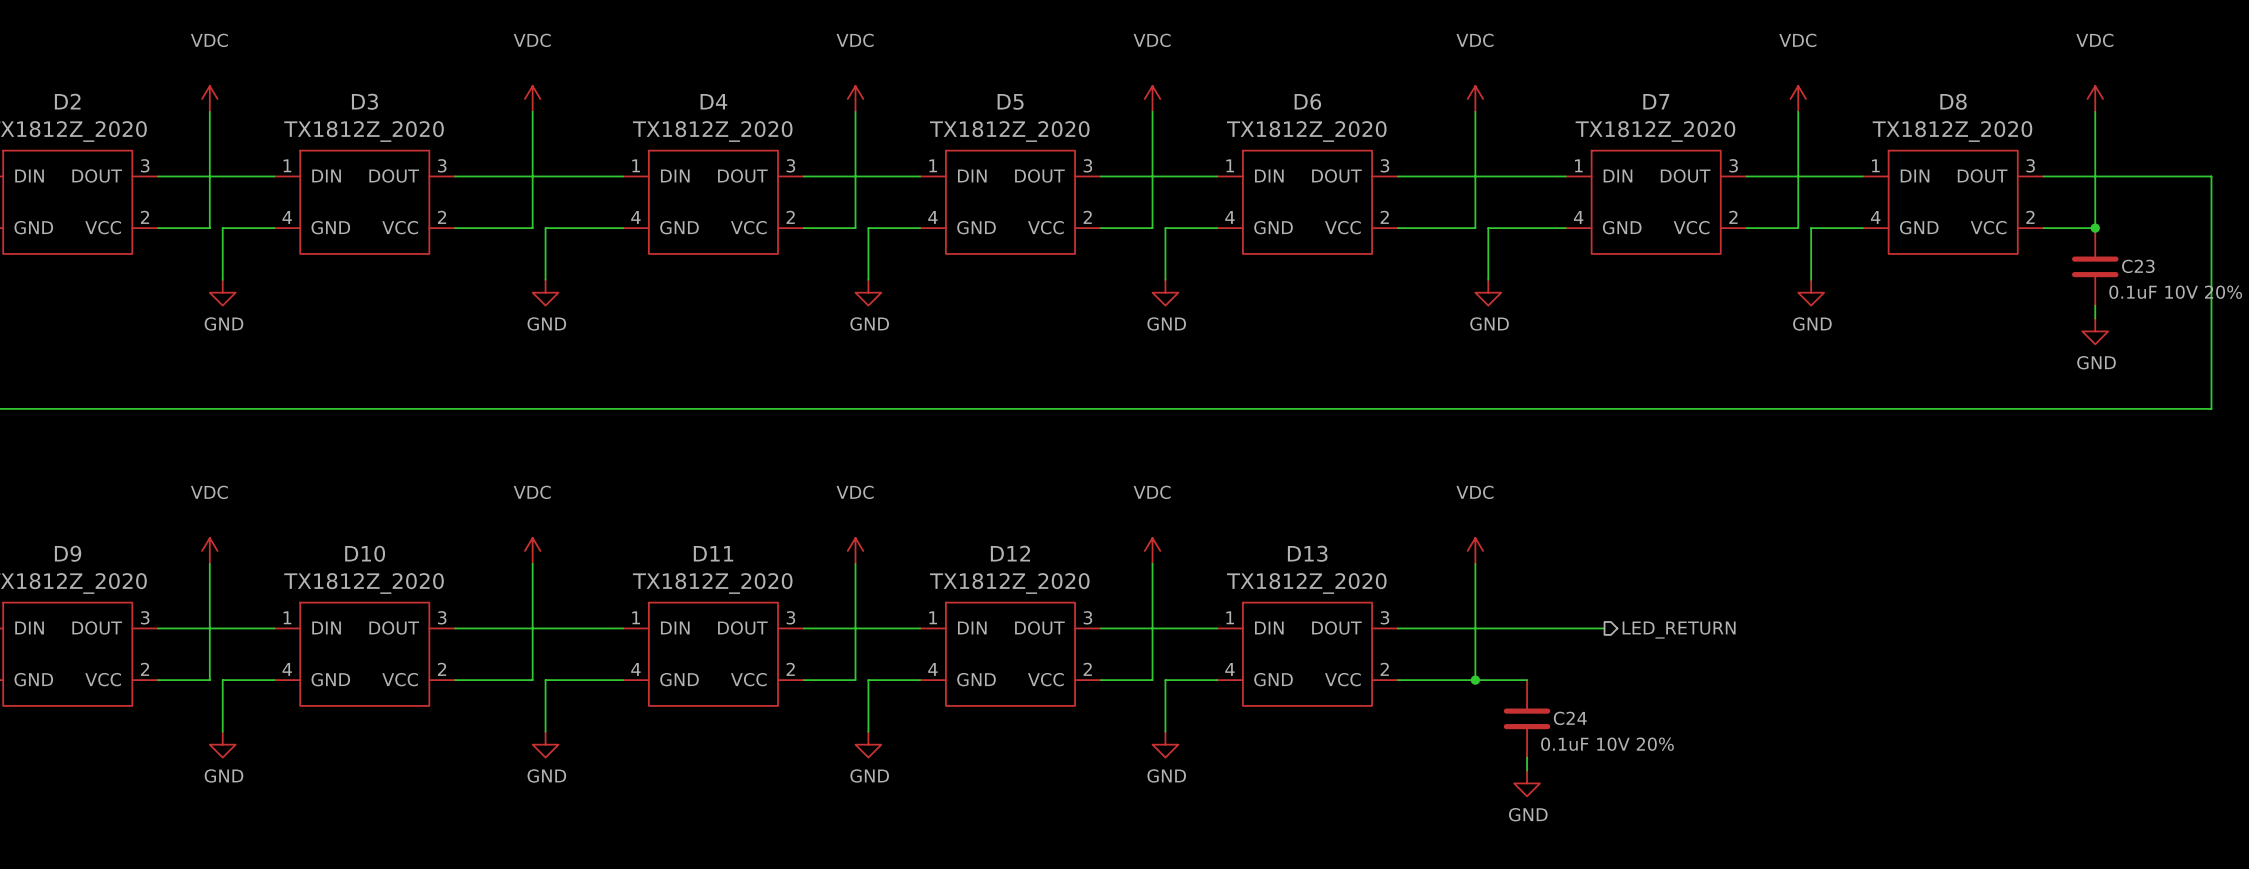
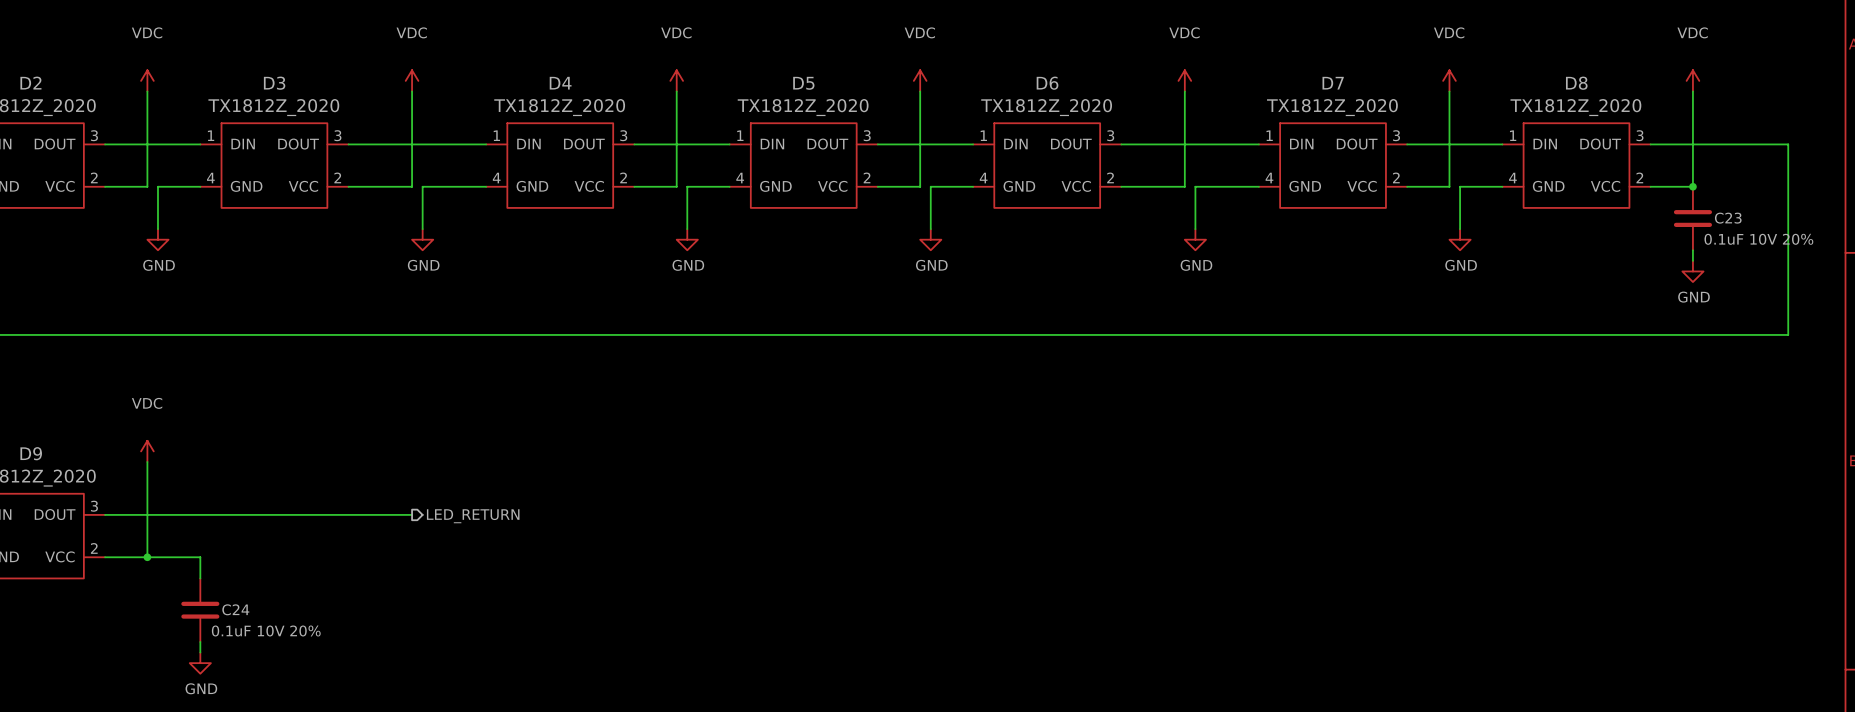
power symbol: VDC (532, 550) -> none
power symbol: VDC (855, 550) -> none
power symbol: VDC (1152, 550) -> none
power symbol: VDC (1475, 550) -> none
wire: (532, 563) (532, 680) (455, 680) -> none
wire: (855, 563) (855, 680) (803, 680) -> none
wire: (1152, 563) (1152, 680) (1100, 680) -> none
wire: (1475, 563) (1475, 680) -> none
wire: none -> (200, 514) (348, 514)
wire: (532, 628) (623, 628) -> none
wire: (803, 628) (920, 628) -> none
wire: (1100, 628) (1217, 628) -> none
wire: (1397, 628) (1604, 628) -> none
hierarchical label: none -> LED_RETURN (473, 516)
hierarchical label: LED_RETURN (1679, 630) -> none
D10: TX1812Z_2020 (364, 654) -> none
D11: TX1812Z_2020 (713, 654) -> none
D12: TX1812Z_2020 (1010, 654) -> none
D13: TX1812Z_2020 (1307, 654) -> none
junction: none -> (147, 557)
wire: (222, 680) (222, 731) -> (157, 557) (147, 557)
wire: none -> (200, 557) (200, 578)
wire: (623, 680) (545, 680) (545, 731) -> none
wire: (920, 680) (868, 680) (868, 731) -> none
wire: (1217, 680) (1165, 680) (1165, 731) -> none
wire: (1397, 680) (1527, 680) -> none
junction: (1475, 680) -> none
C24 position: (1527, 718) -> (200, 610)
power symbol position: GND (222, 744) -> GND (200, 663)
power symbol: GND (545, 744) -> none
power symbol: GND (868, 744) -> none
power symbol: GND (1165, 744) -> none
wire: (1527, 757) (1527, 770) -> none
wire: none -> (200, 641) (200, 652)
power symbol: GND (1527, 783) -> none

